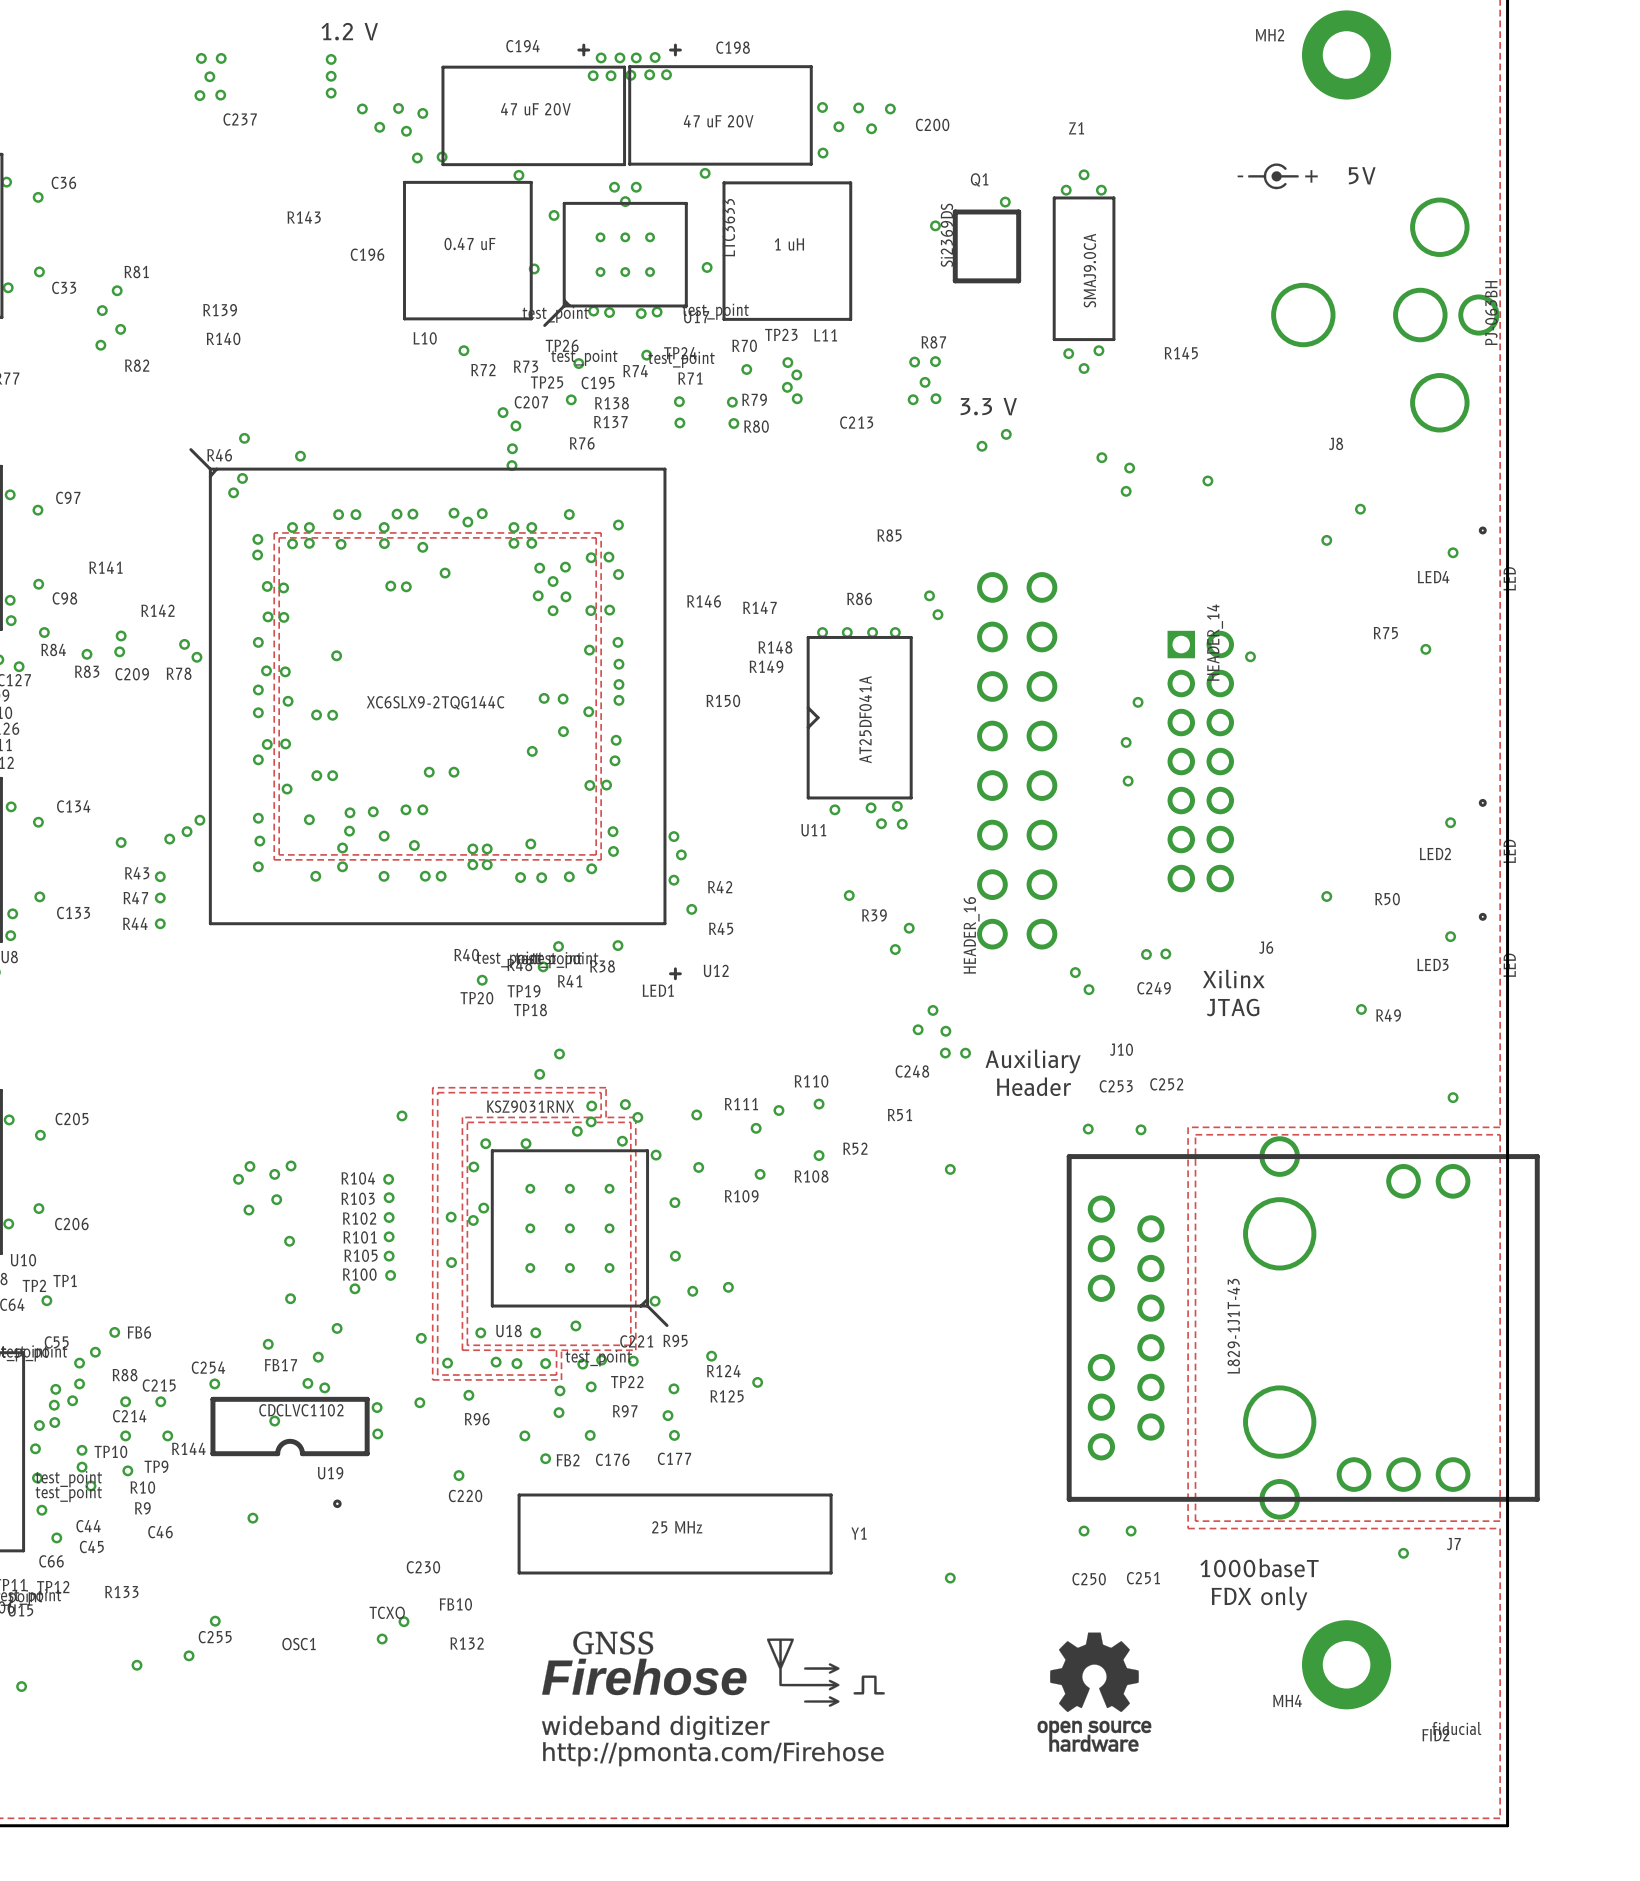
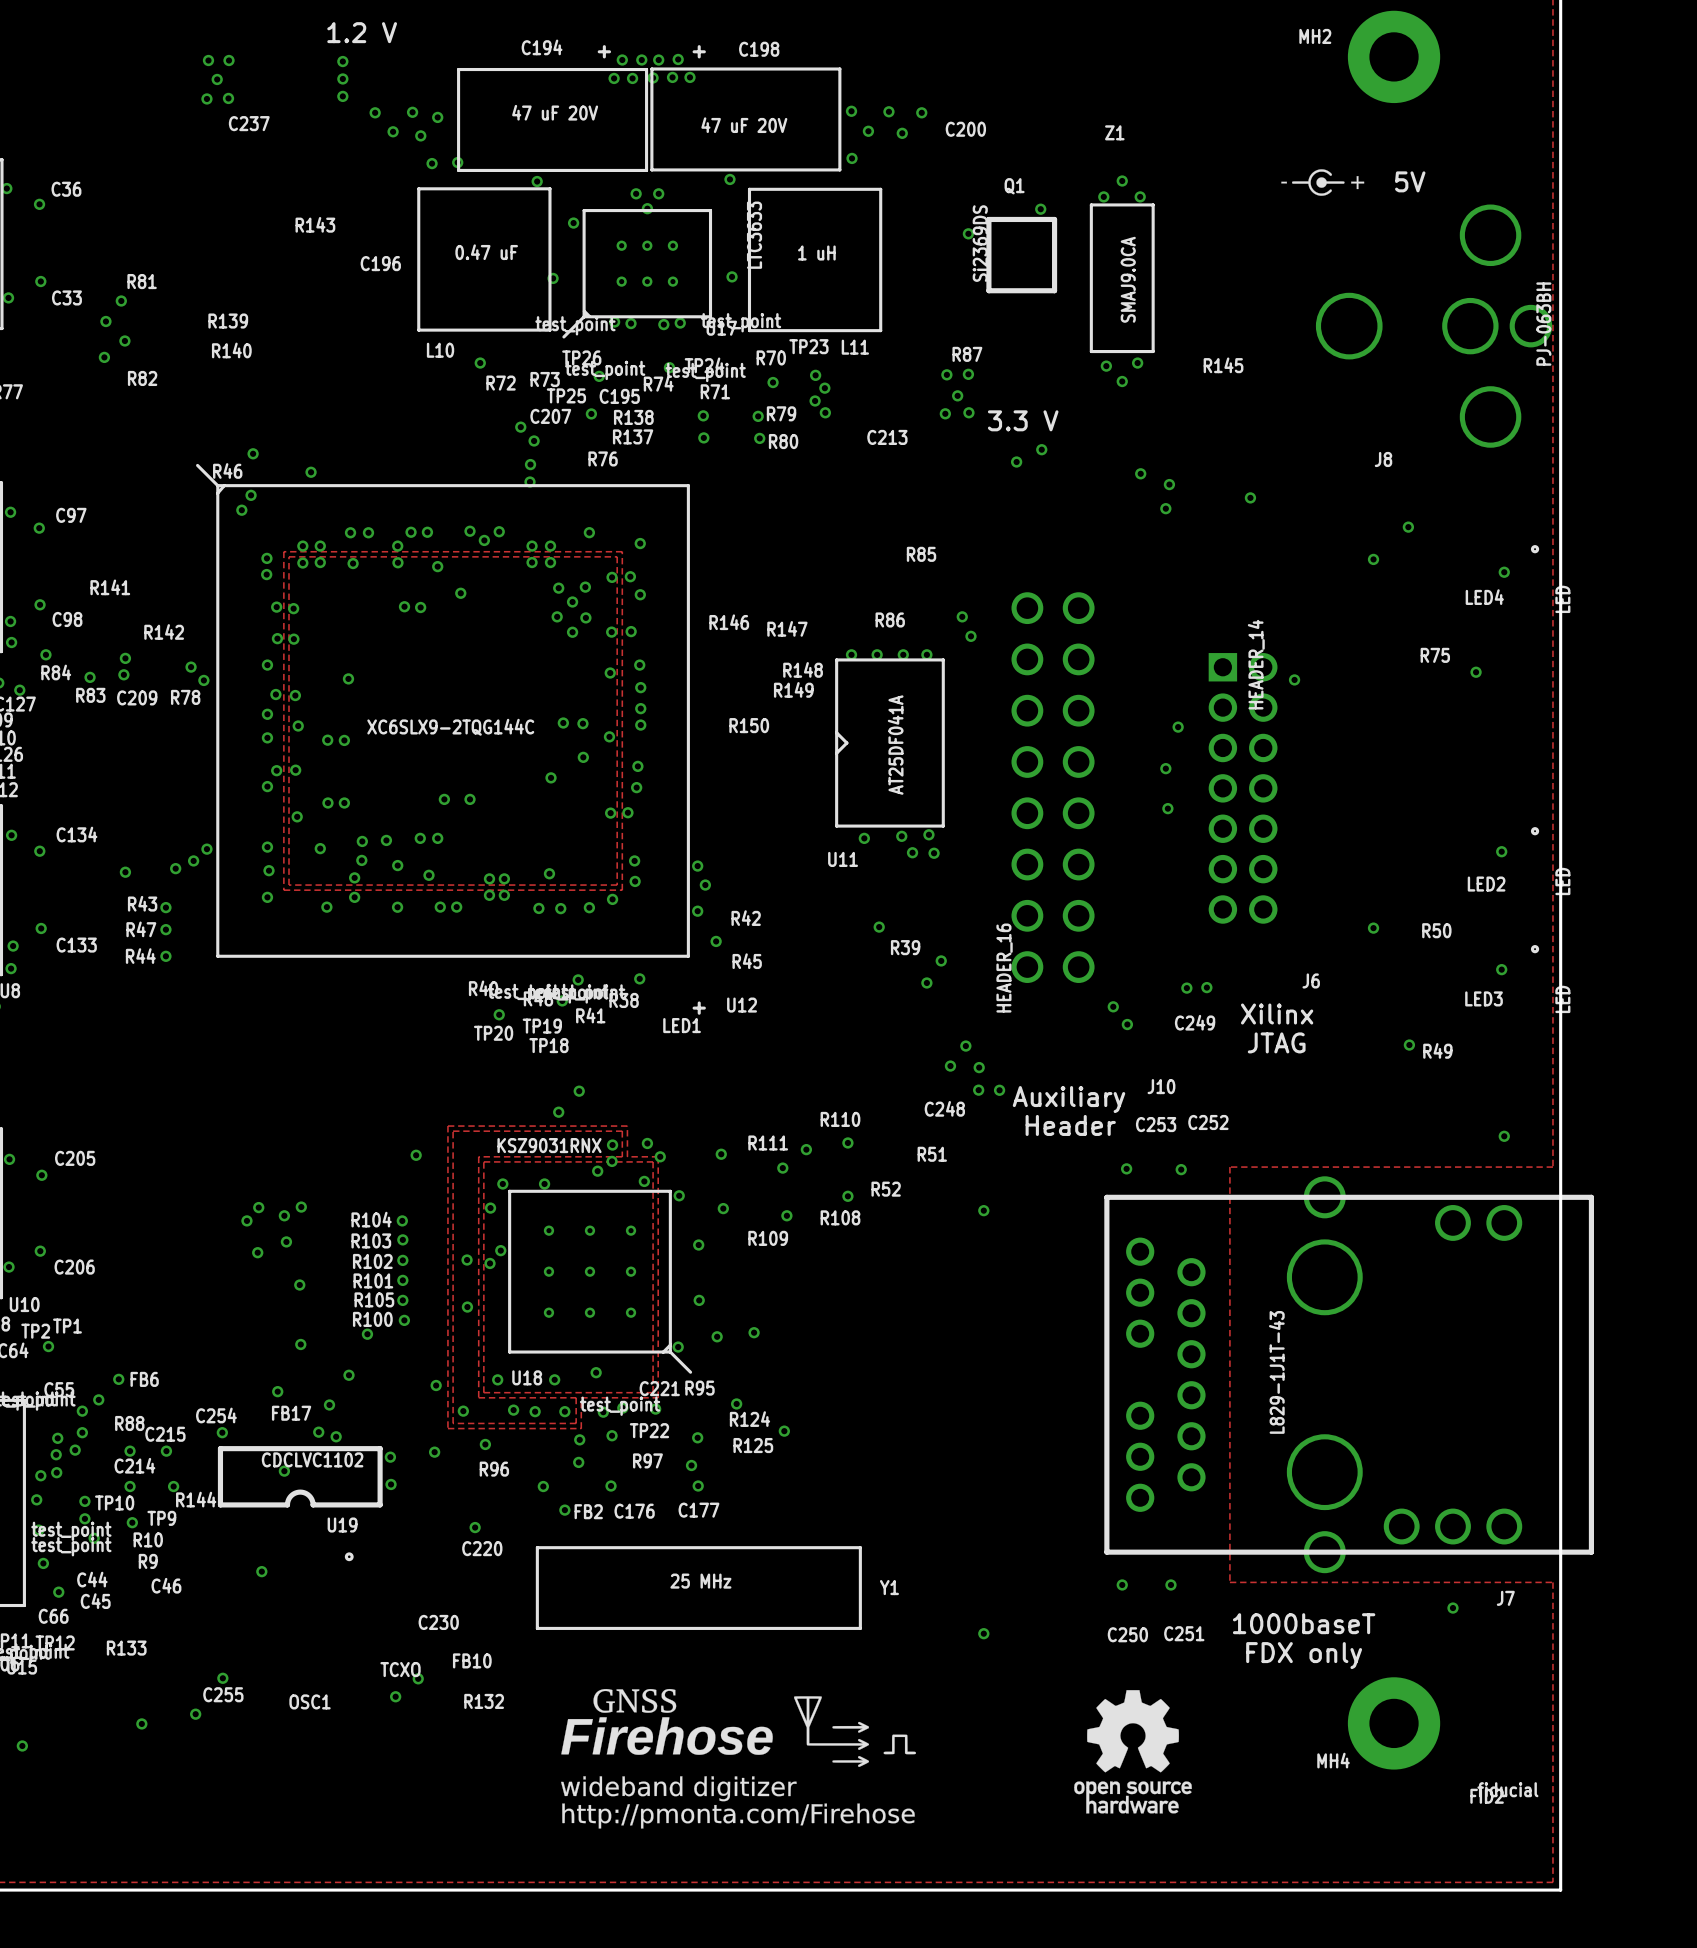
zone outline: (1195, 1134) (1500, 1134) (1500, 1521) (1195, 1521) (1195, 1134) -> none

